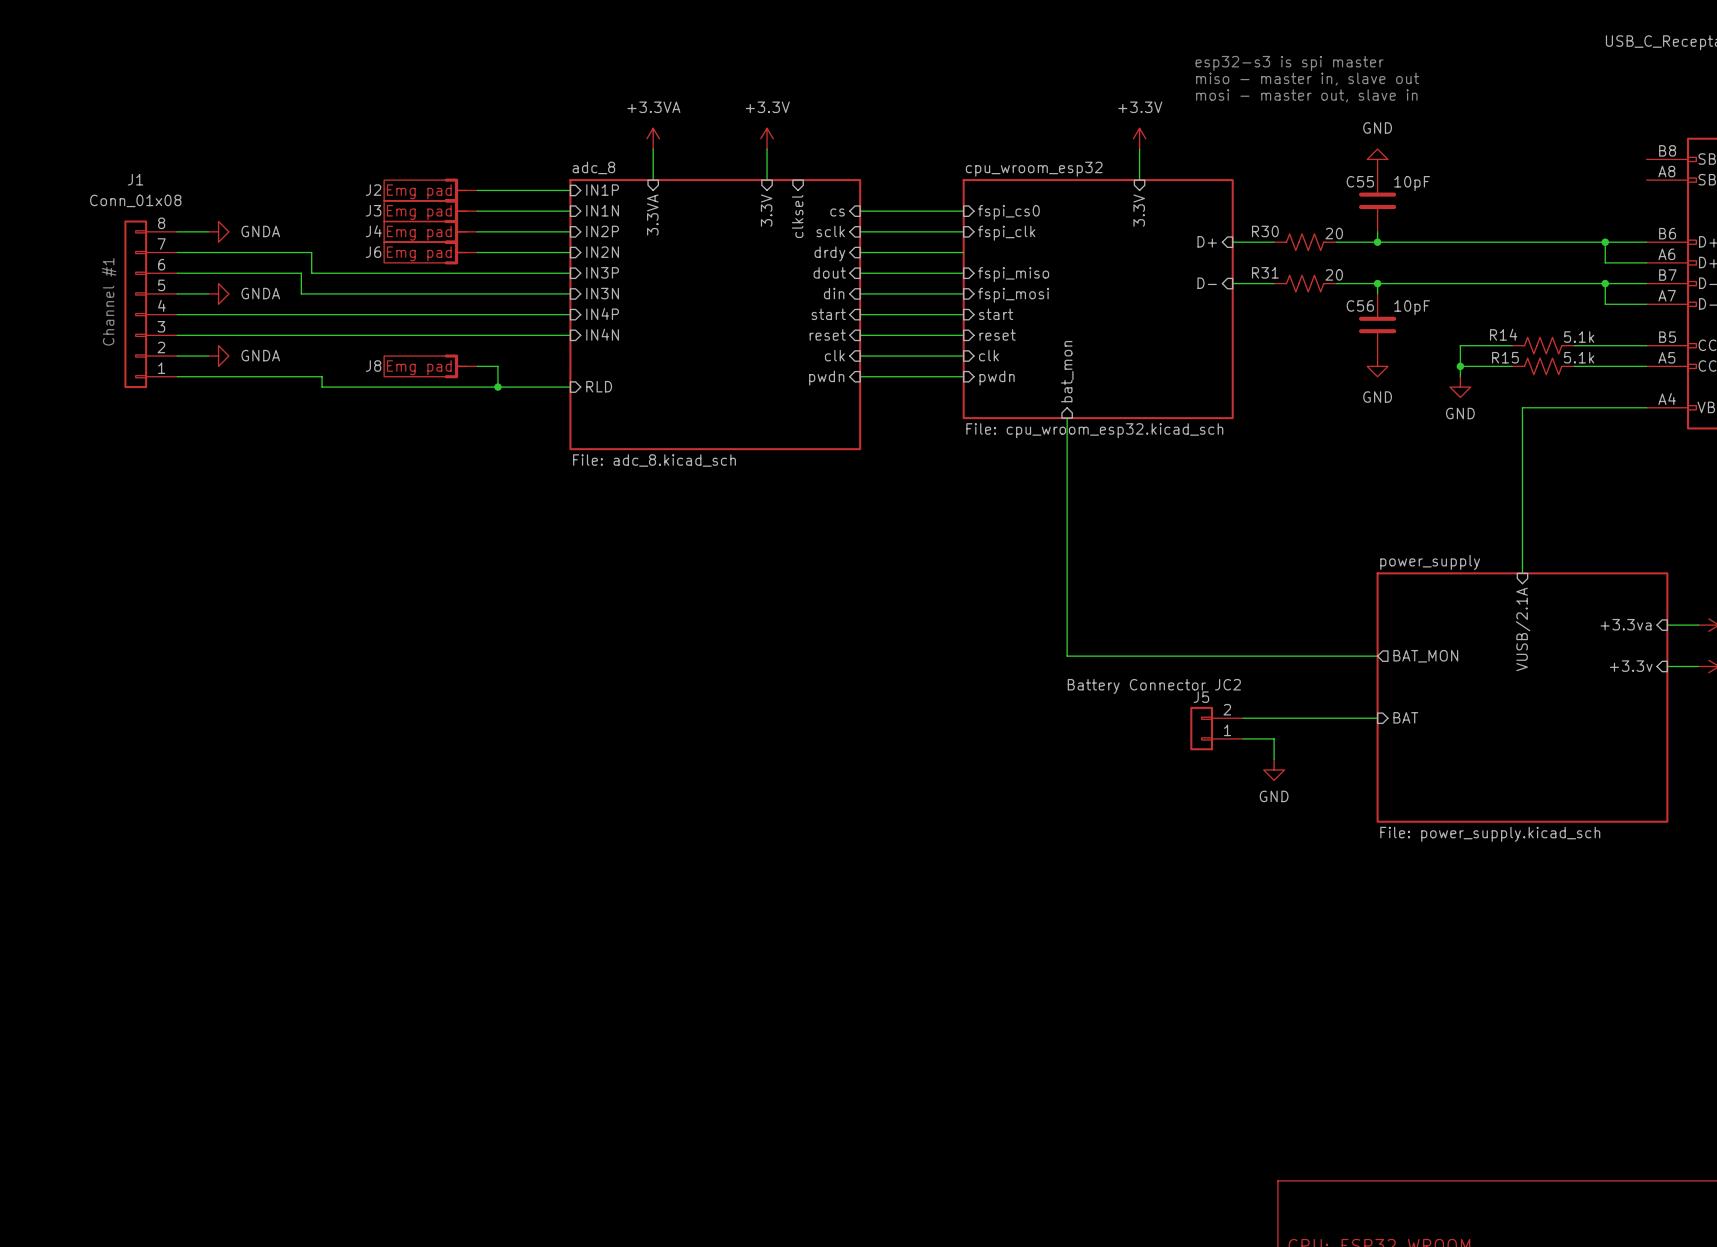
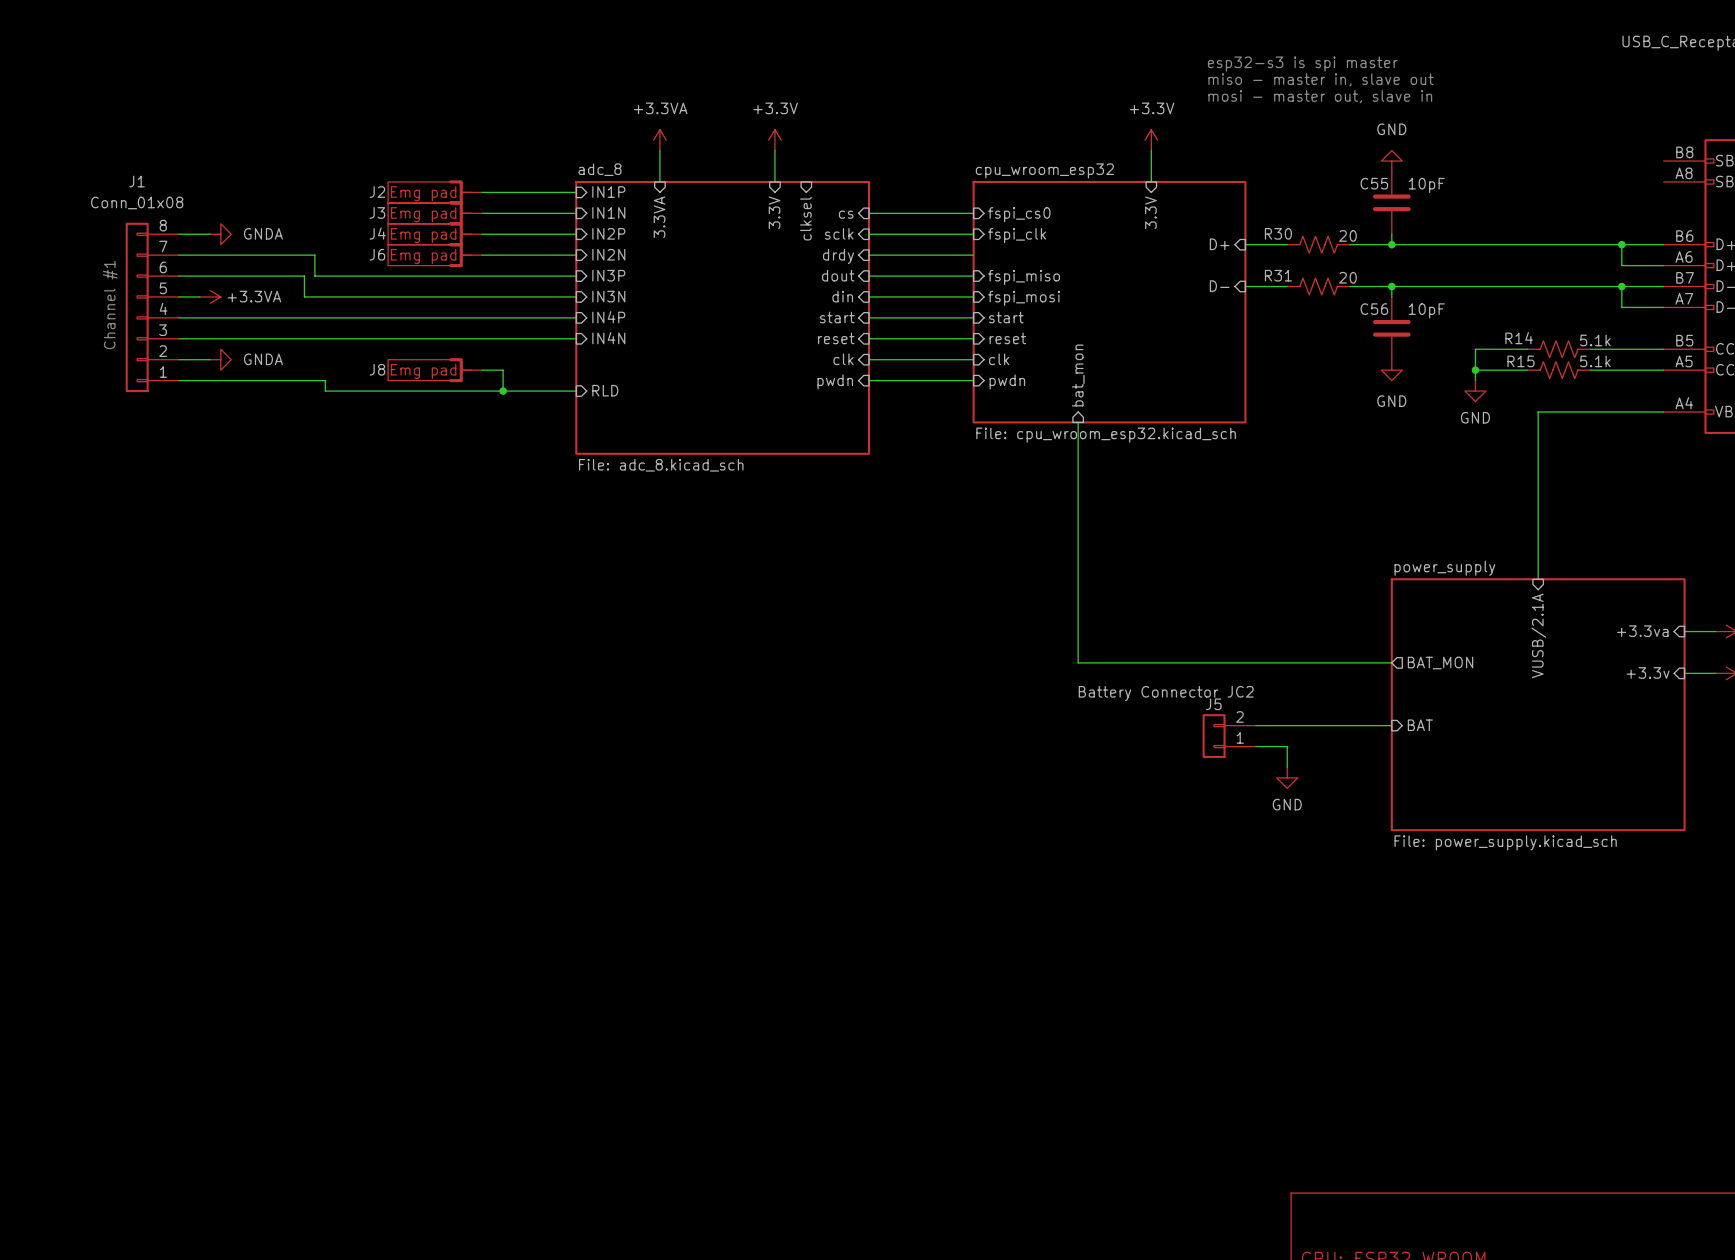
power symbol: none -> +3.3VA (210, 296)
power symbol: GNDA (218, 293) -> none

